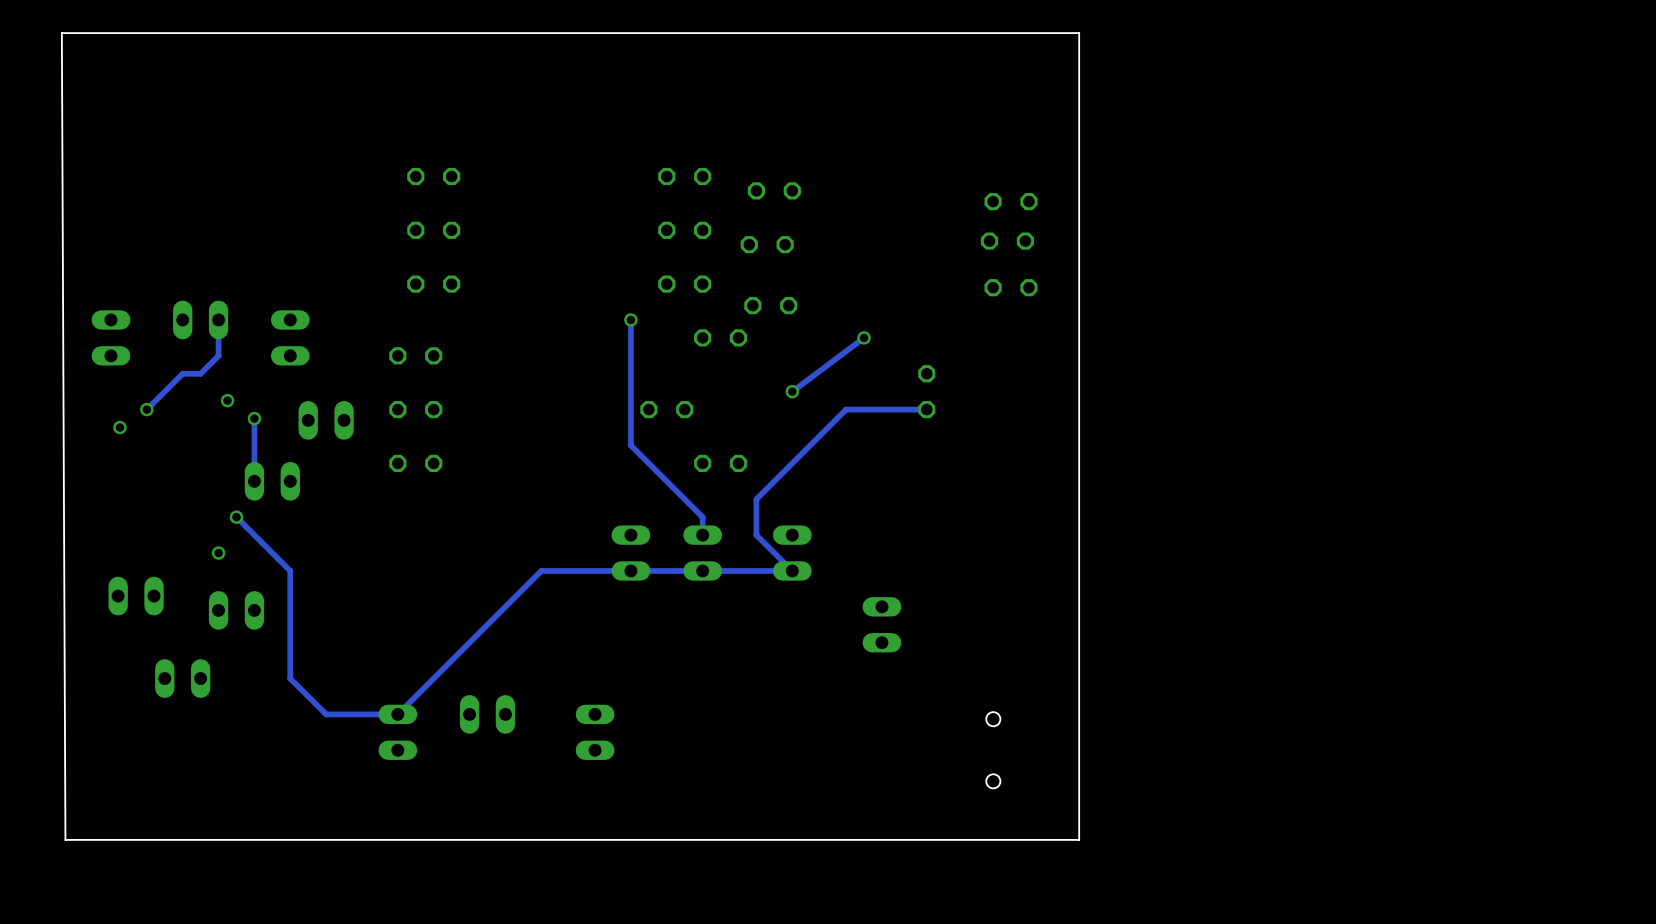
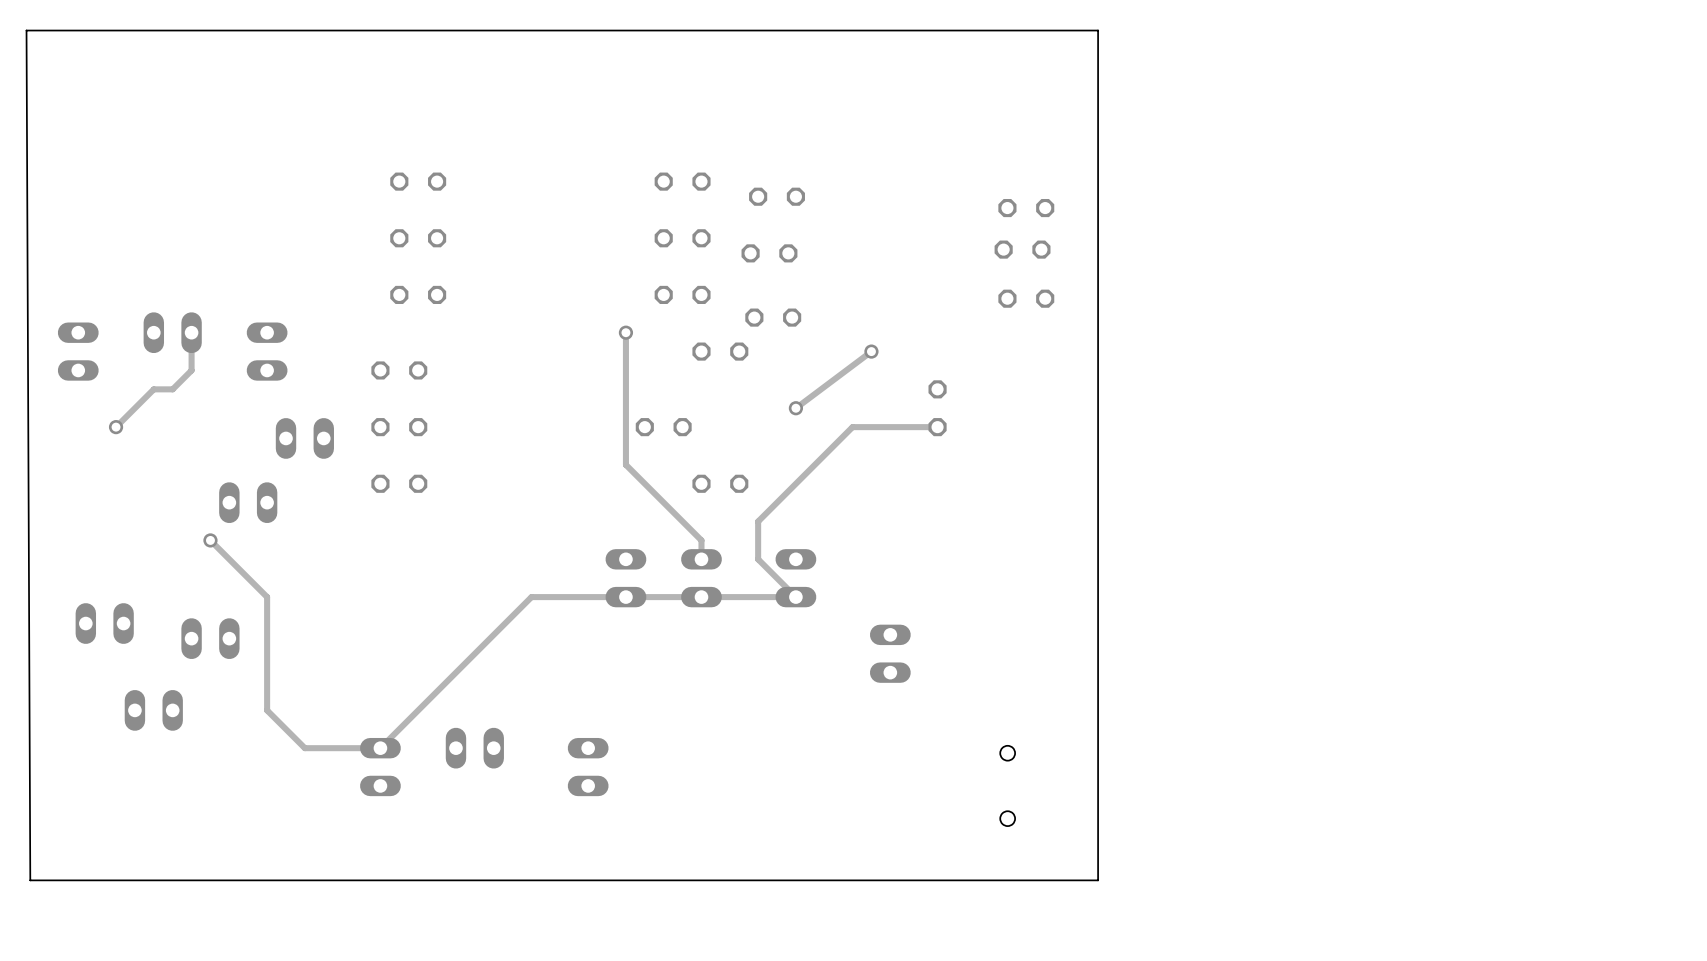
via: (227, 400) -> none
track: (254, 418) (254, 481) -> none
via: (254, 418) -> none
via: (119, 427) -> none
via: (218, 553) -> none

